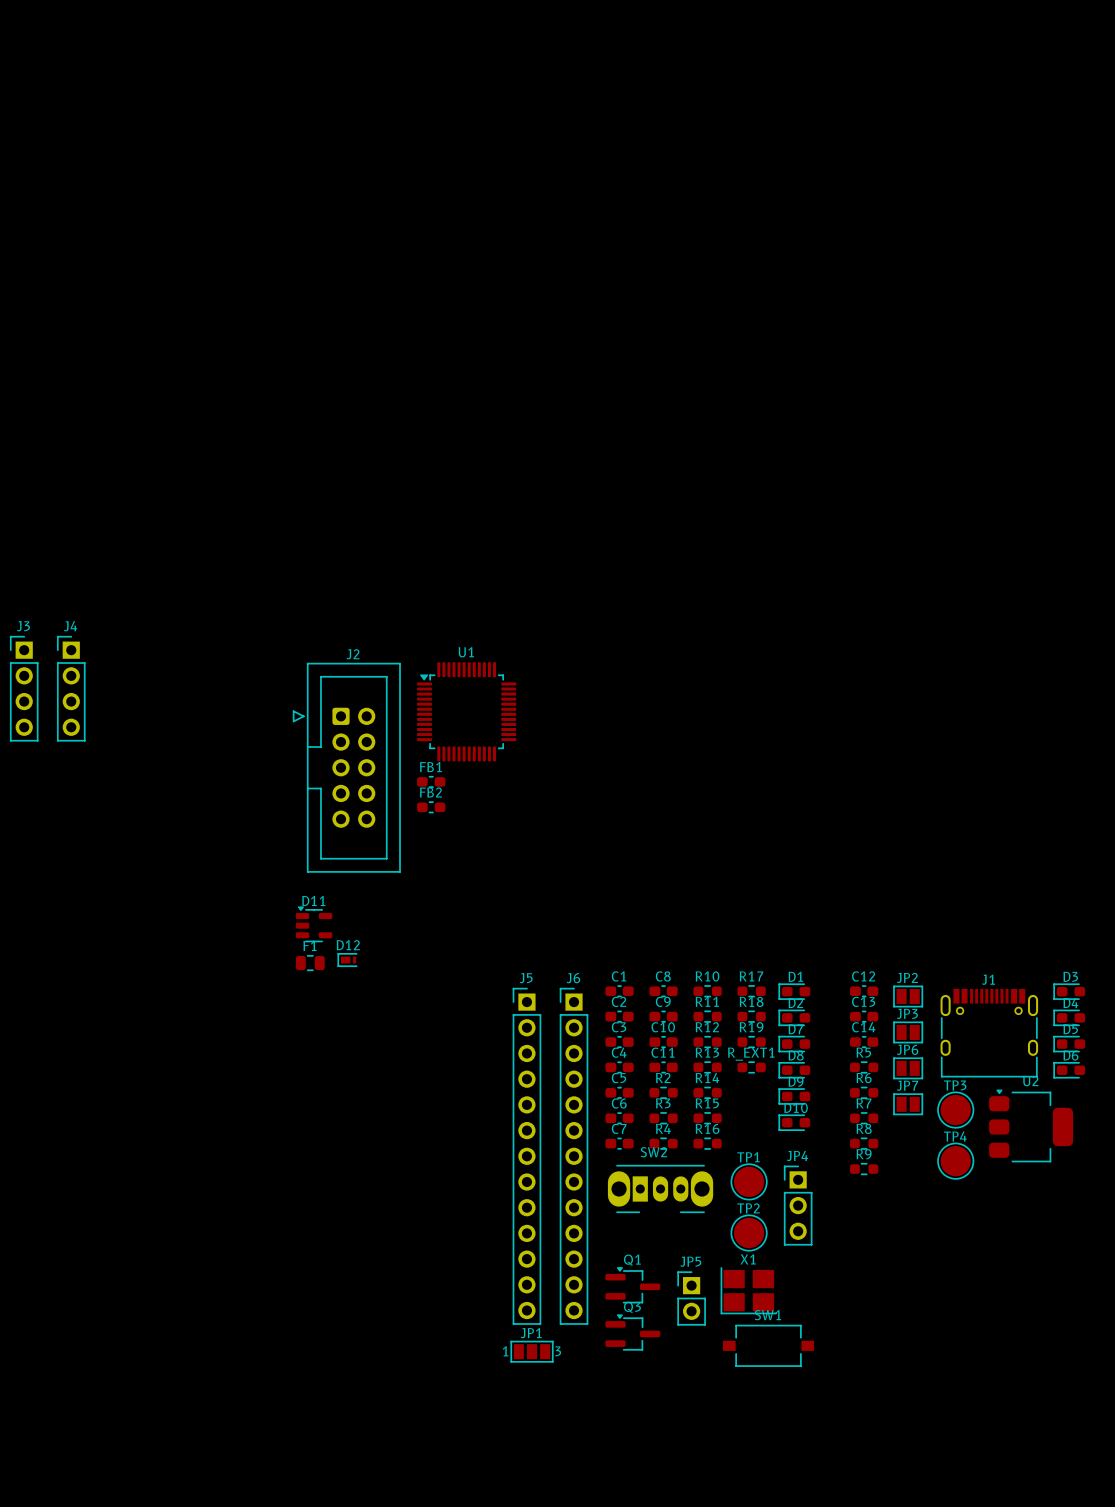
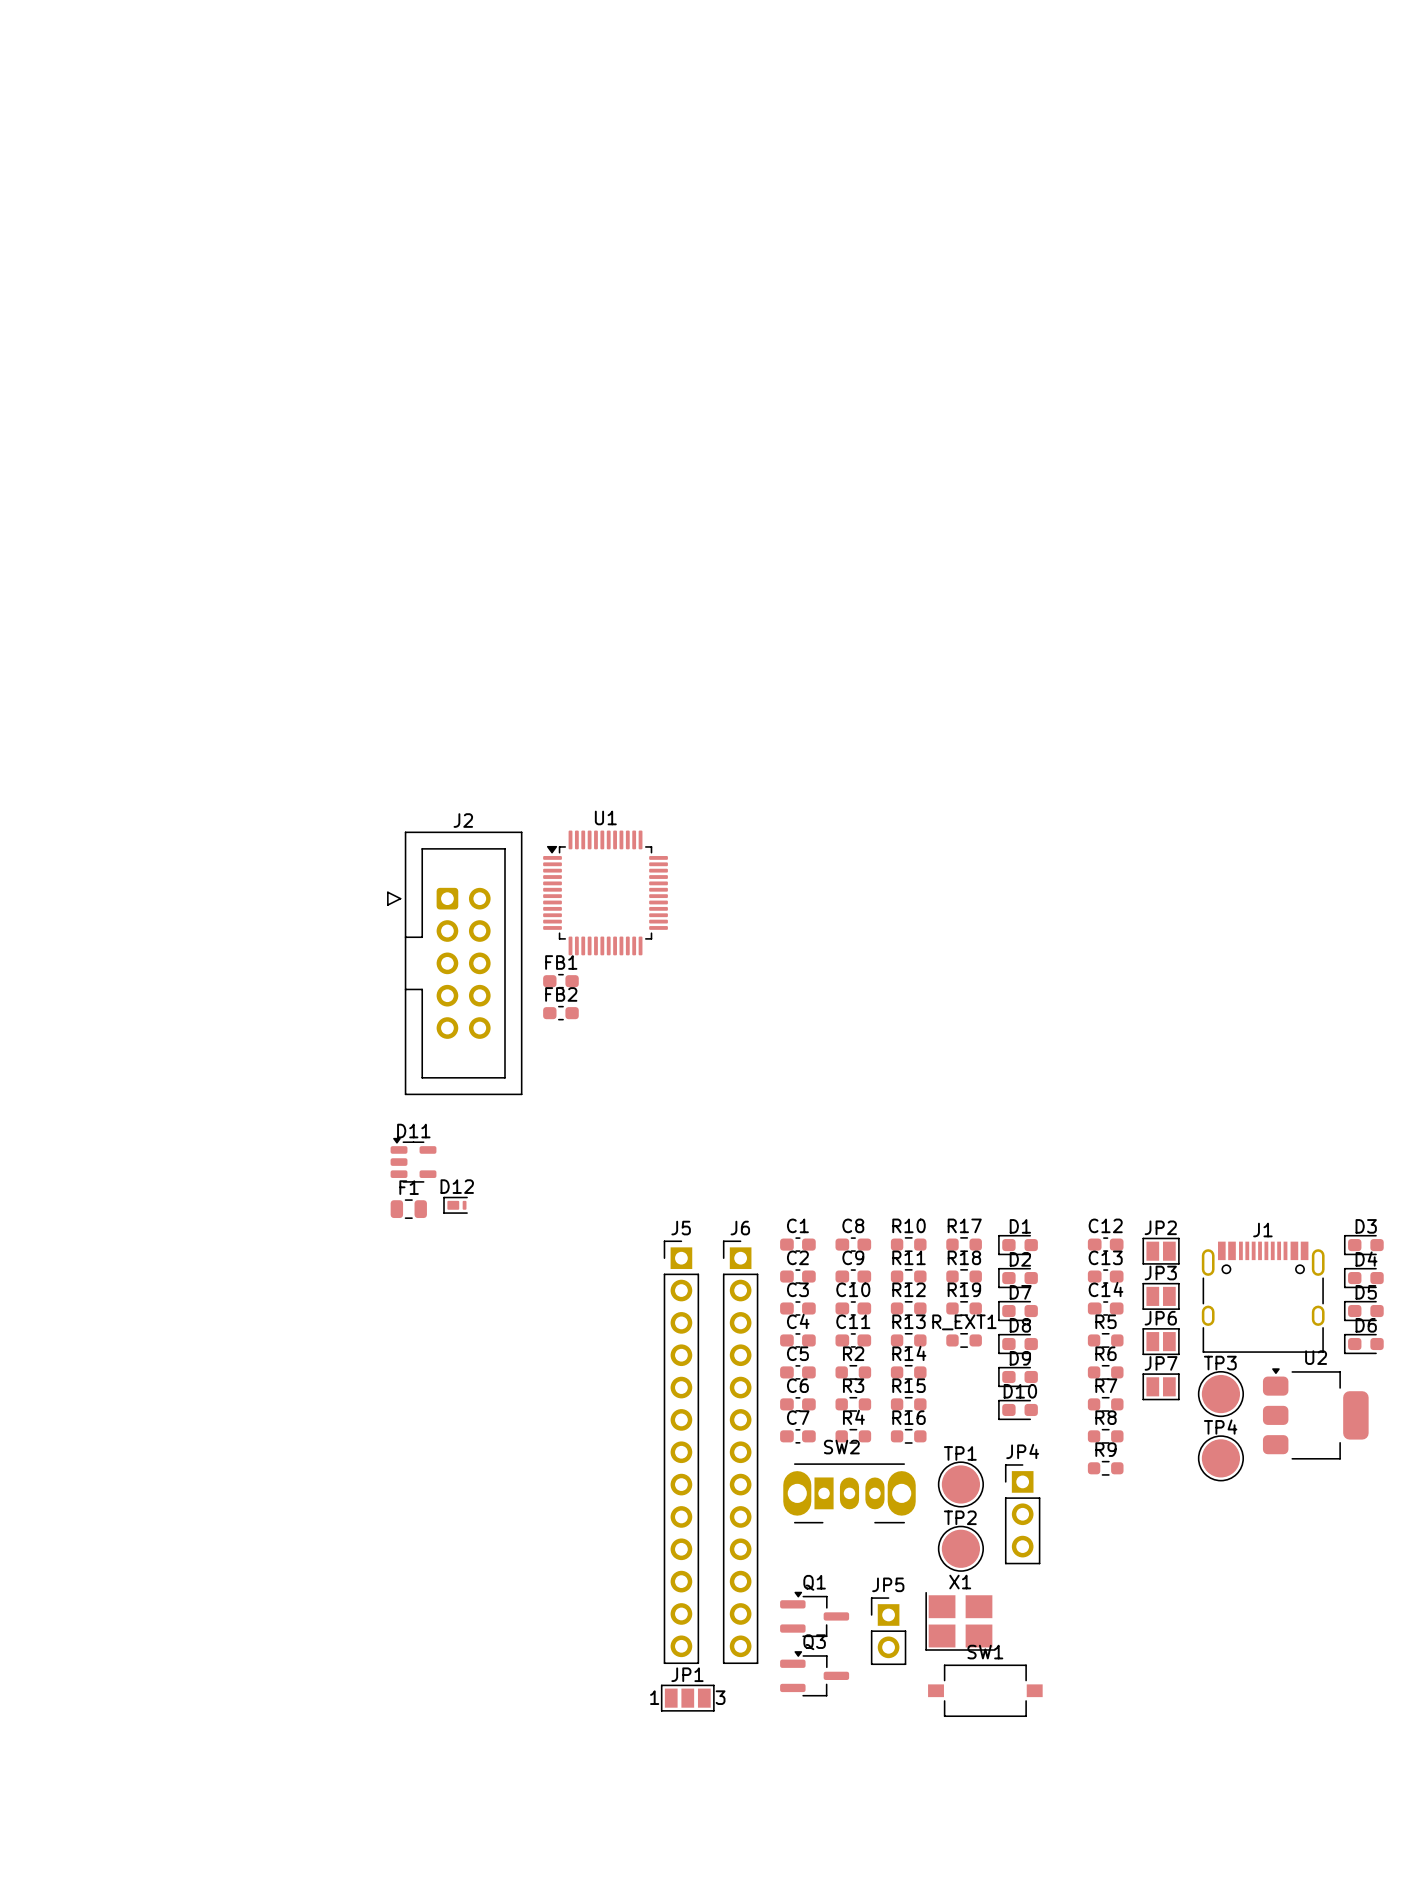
J3: (24, 688) -> none
J4: (71, 688) -> none

